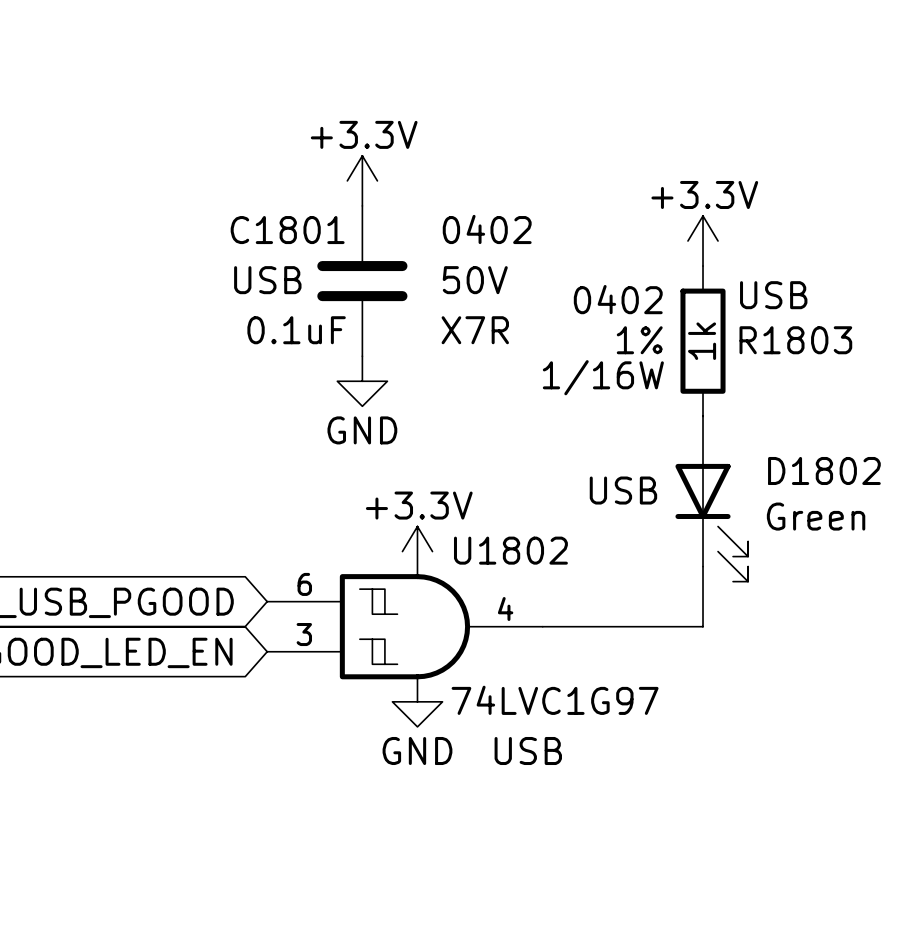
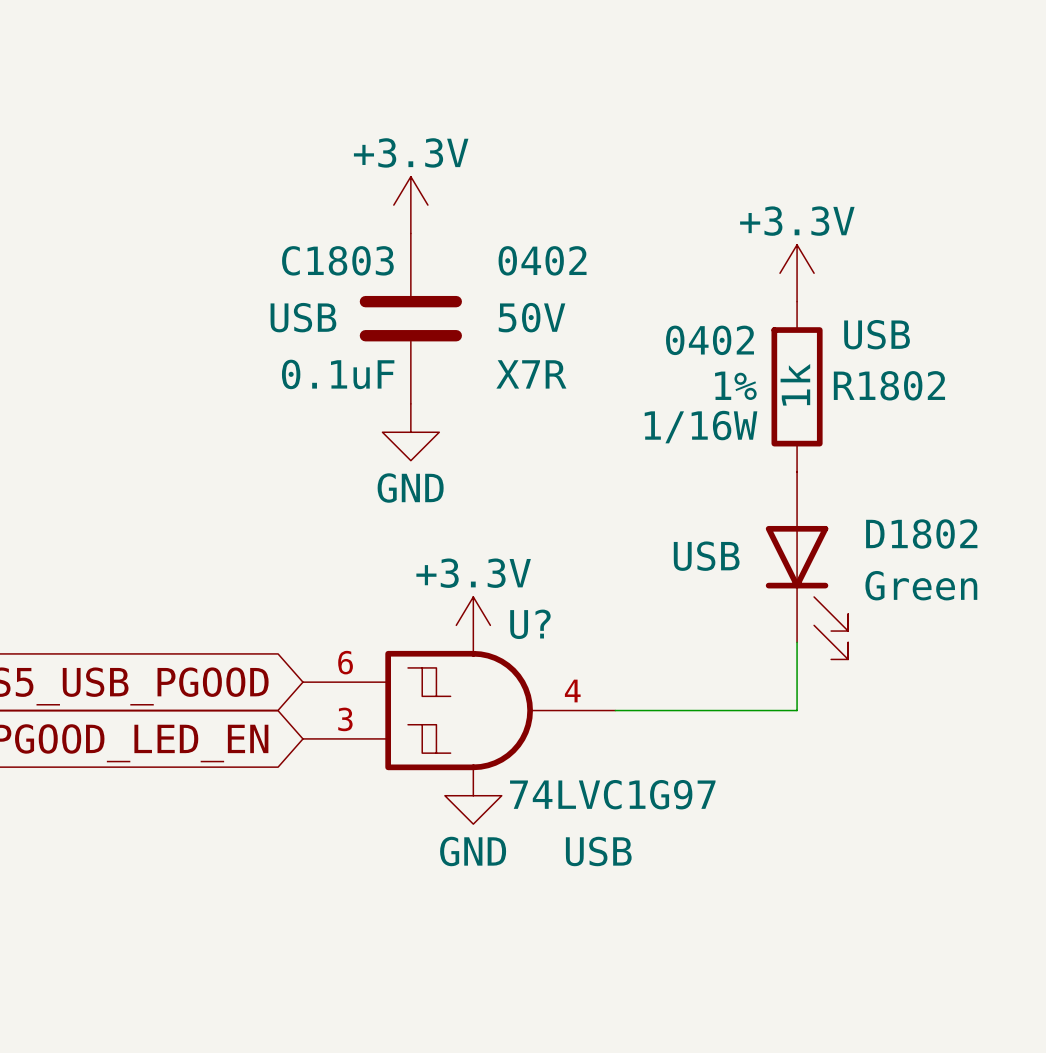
C1801 name: C1801 (287, 230) -> C1803 (337, 260)
R1803 name: R1803 (795, 340) -> R1802 (889, 385)
U1802 name: U1802 (510, 550) -> U? (530, 624)

